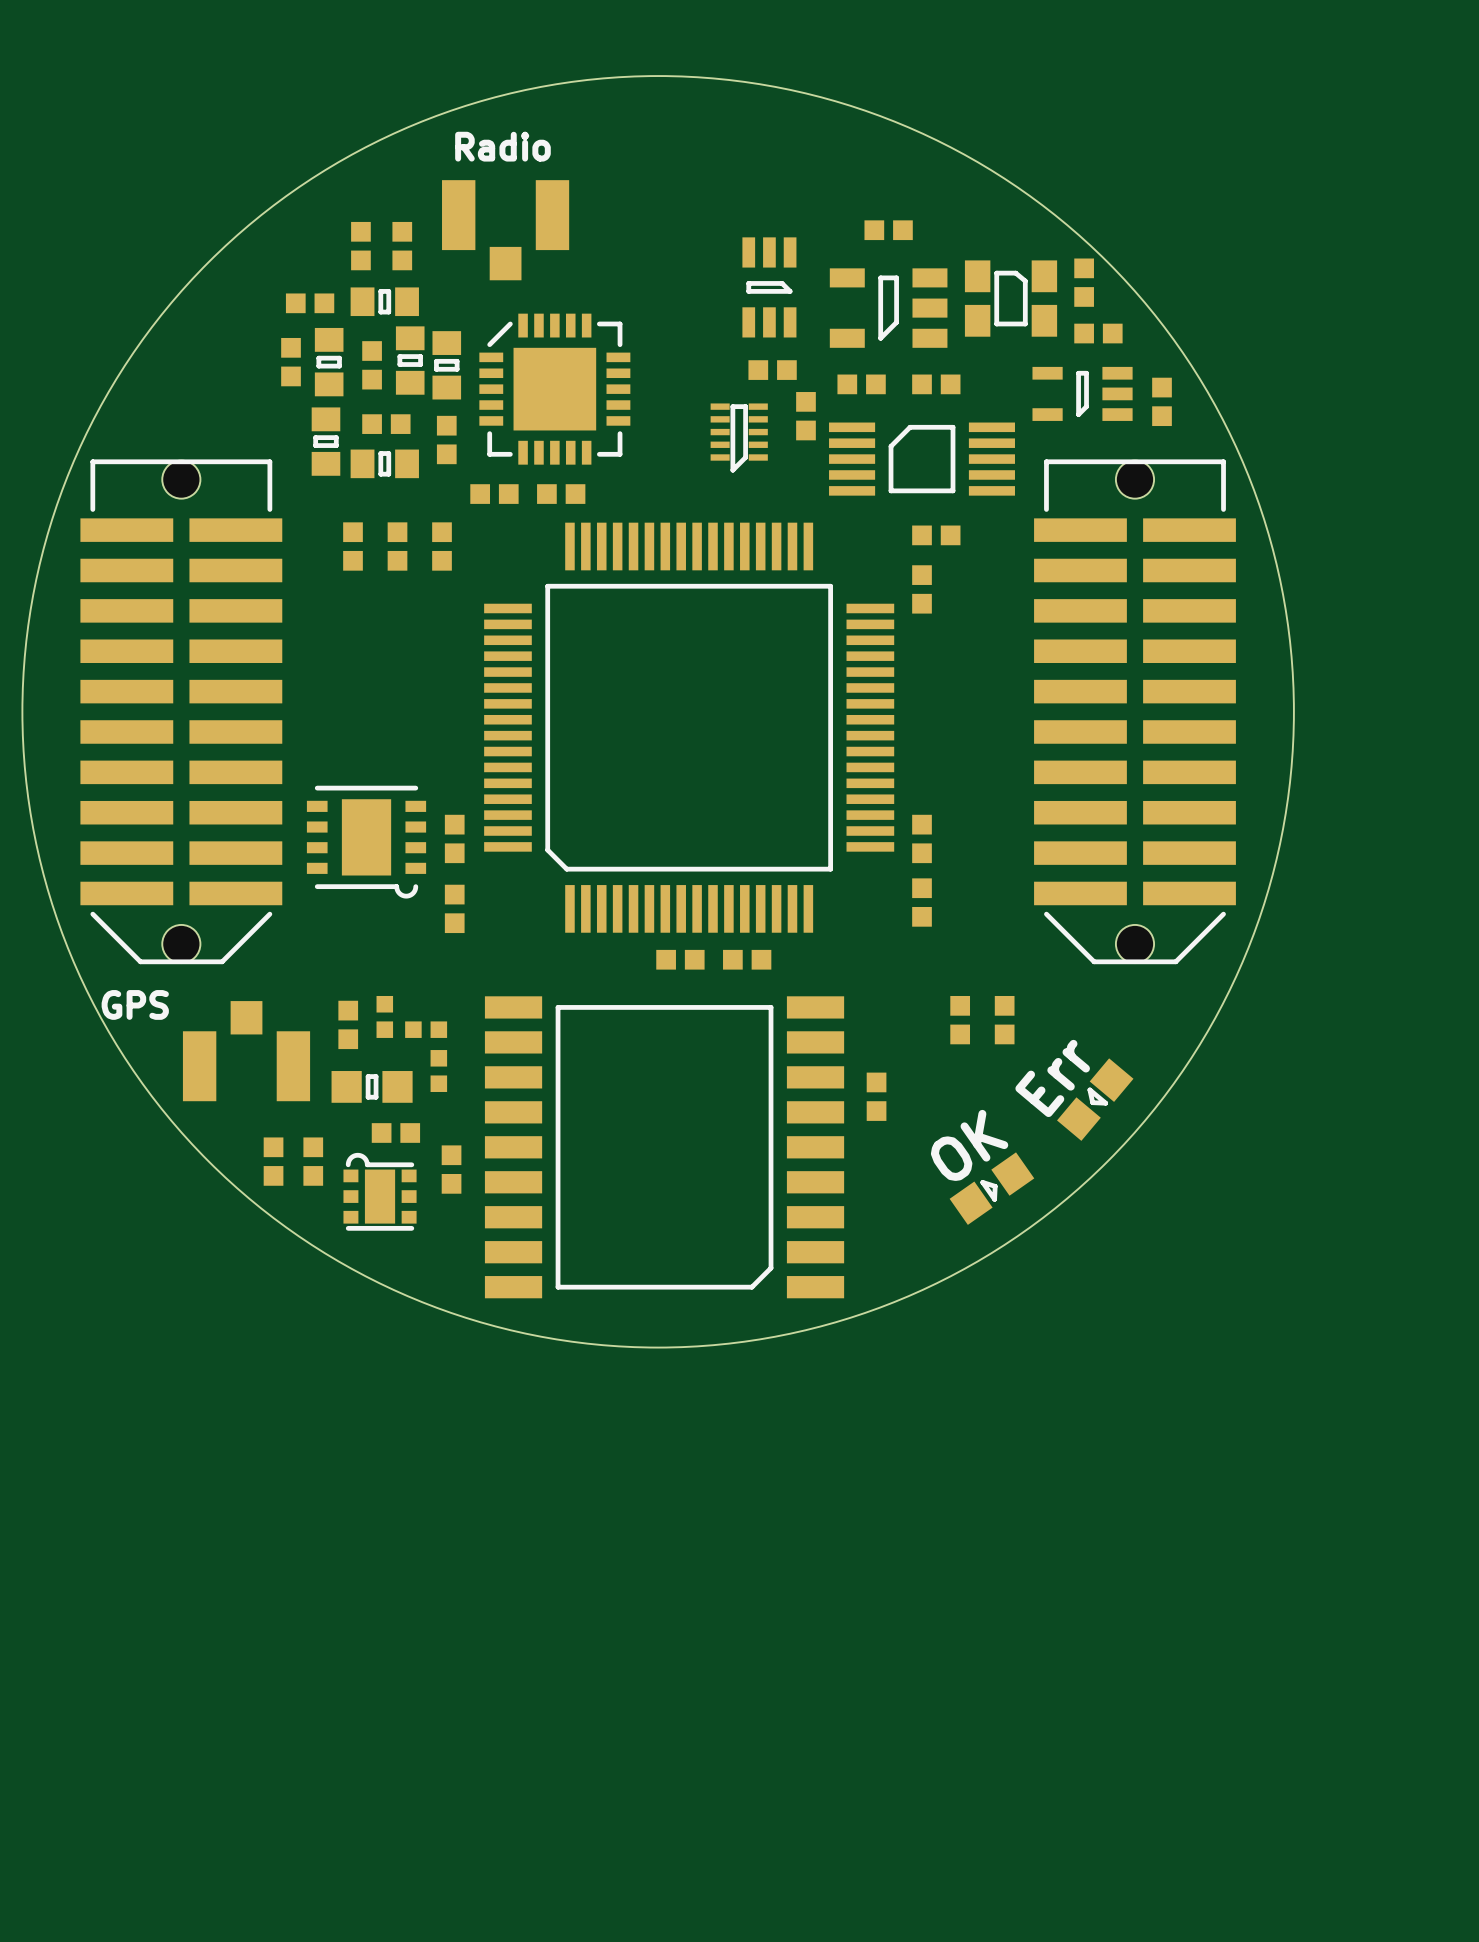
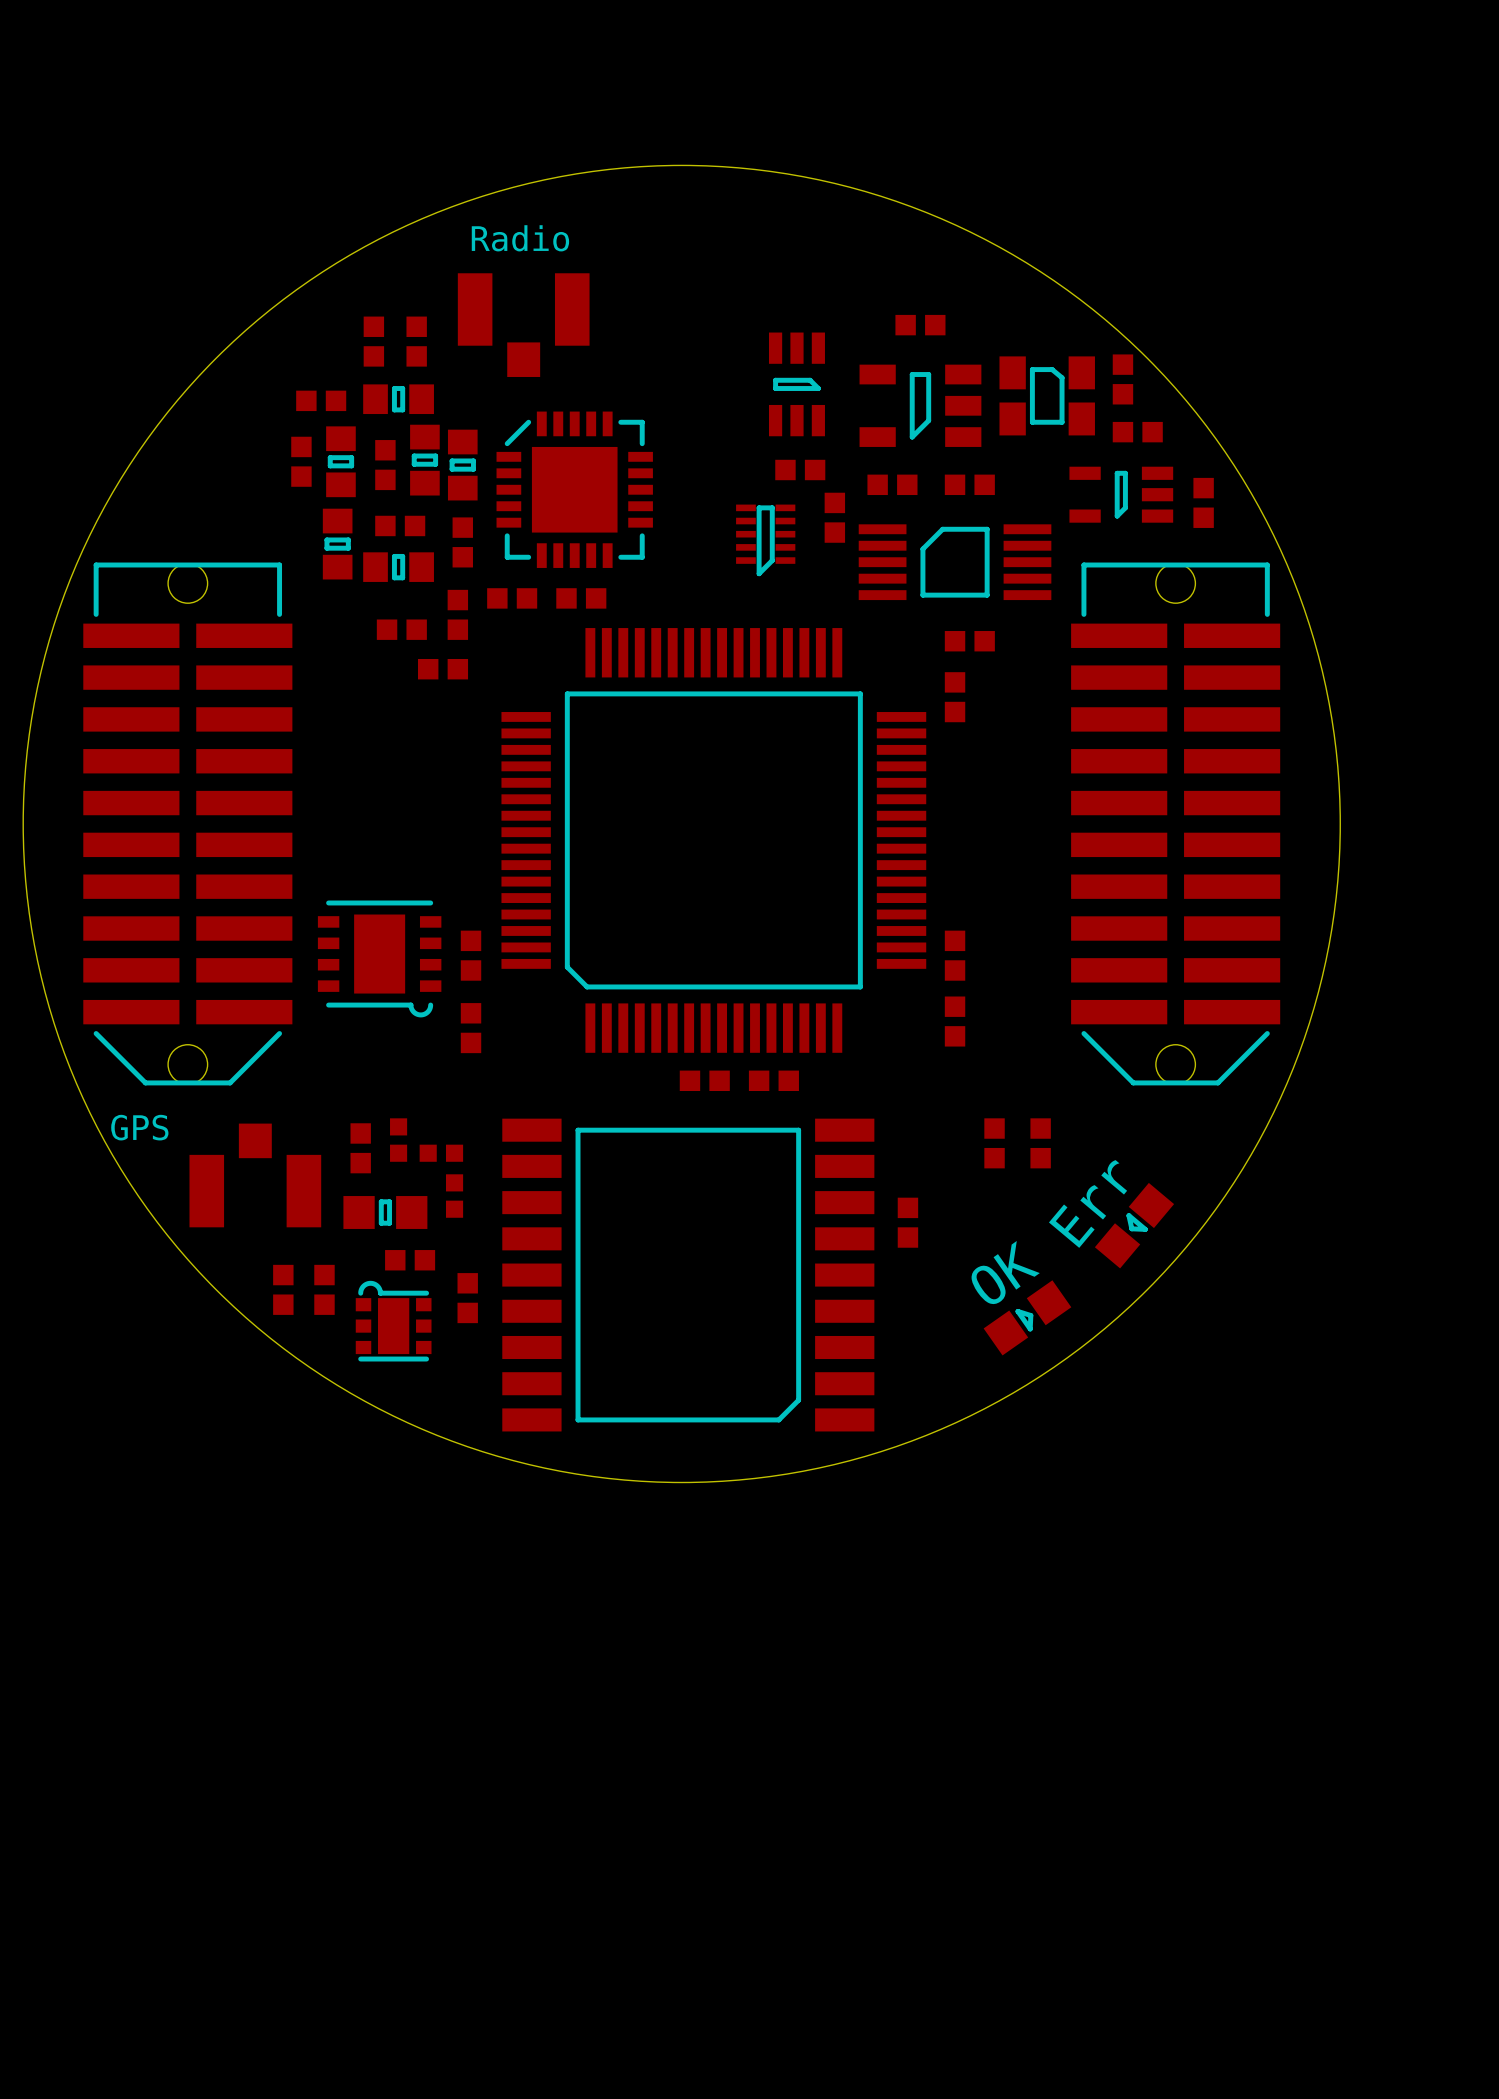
part: none -> (457, 614)
part: none -> (401, 629)
part: (353, 546) -> none
part: (397, 546) -> none
part: (442, 546) -> none
part: none -> (443, 669)

